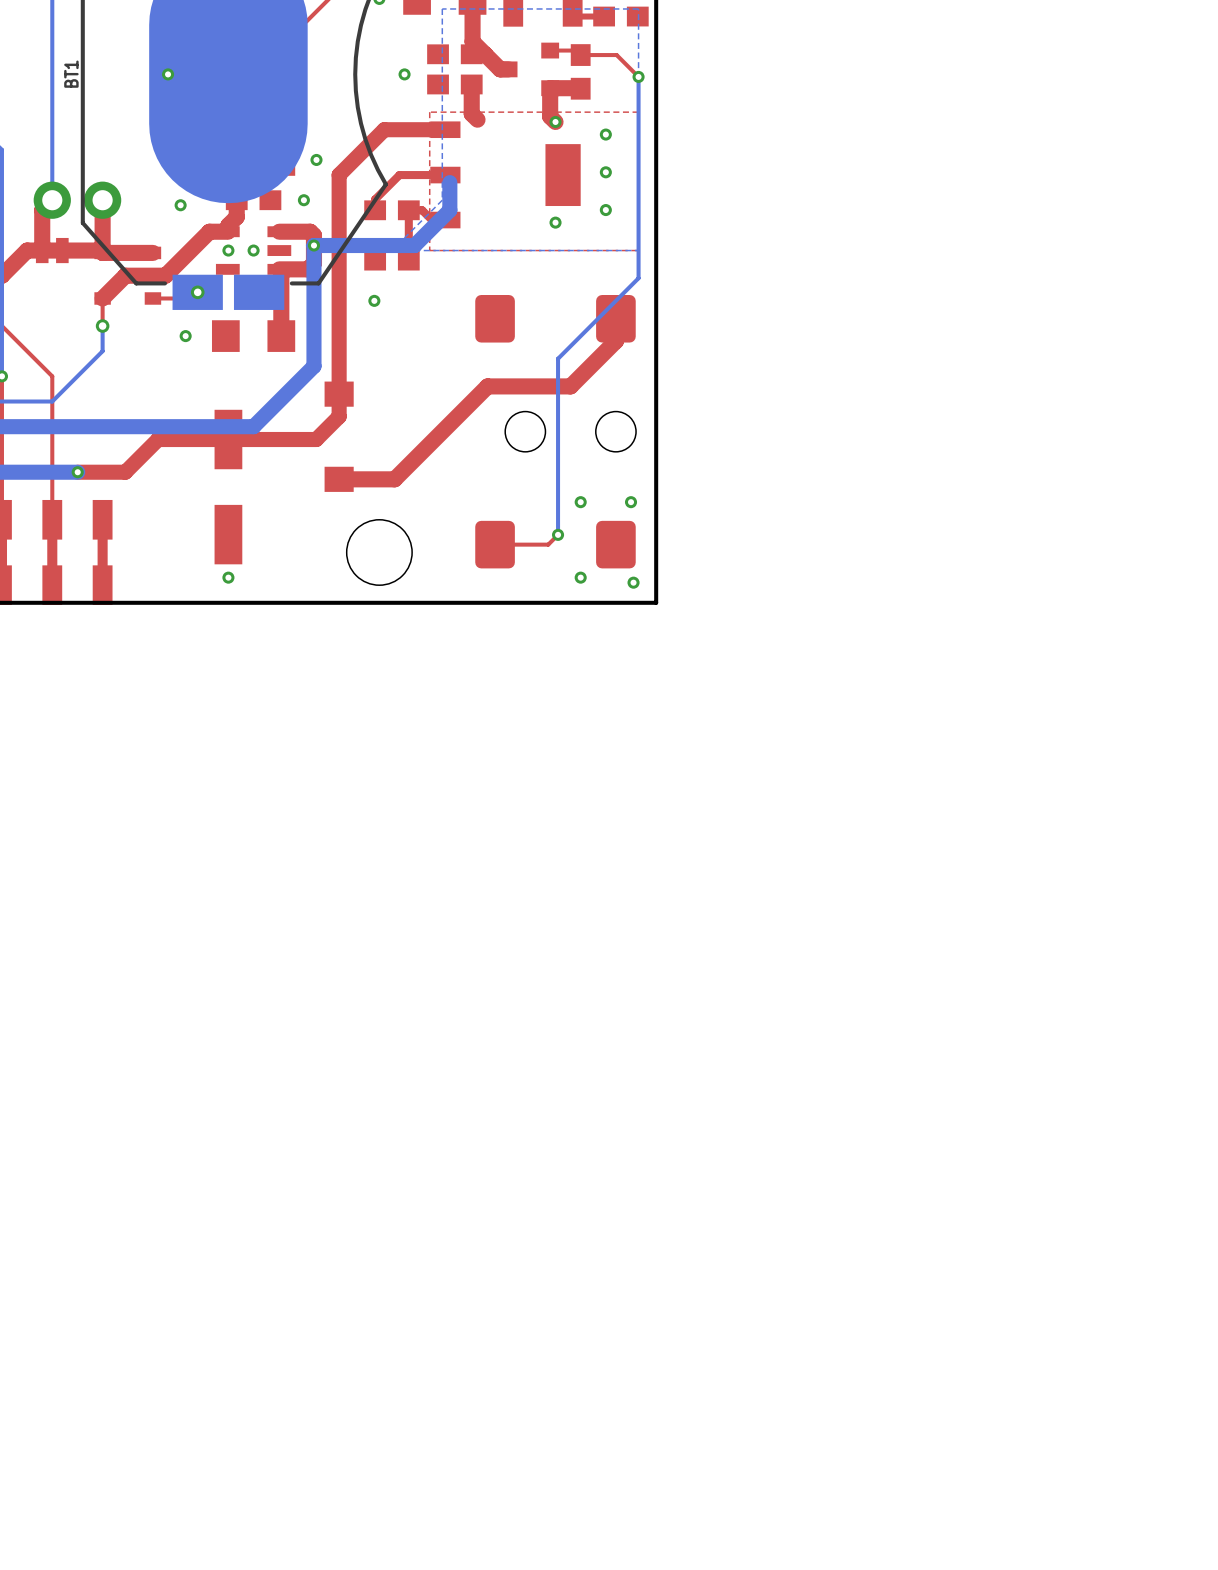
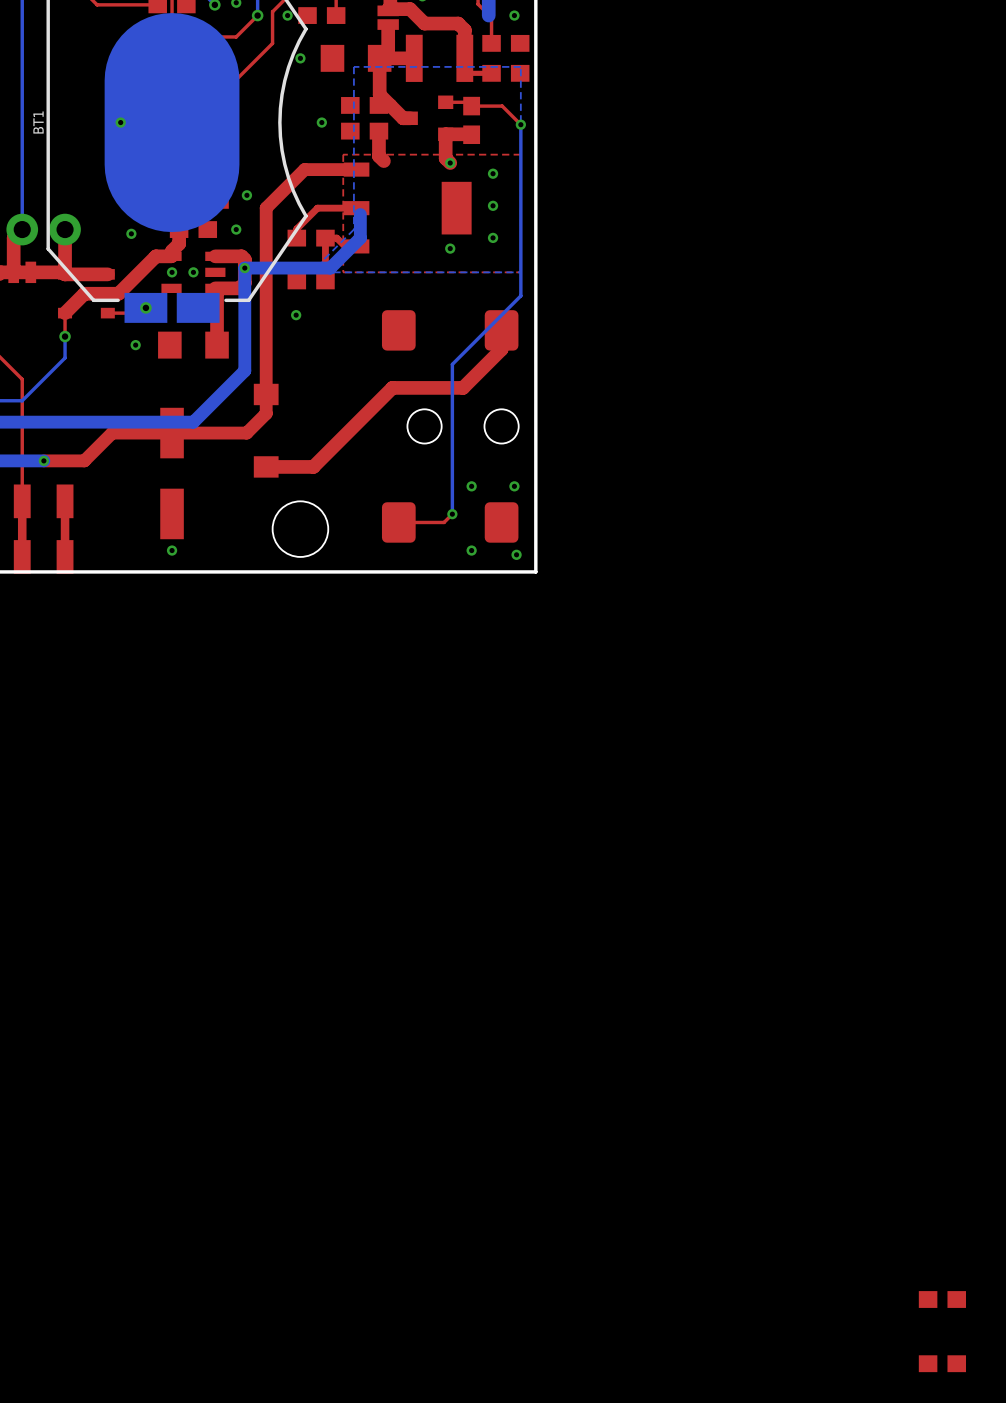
part: none -> (942, 1299)
part: none -> (942, 1363)

